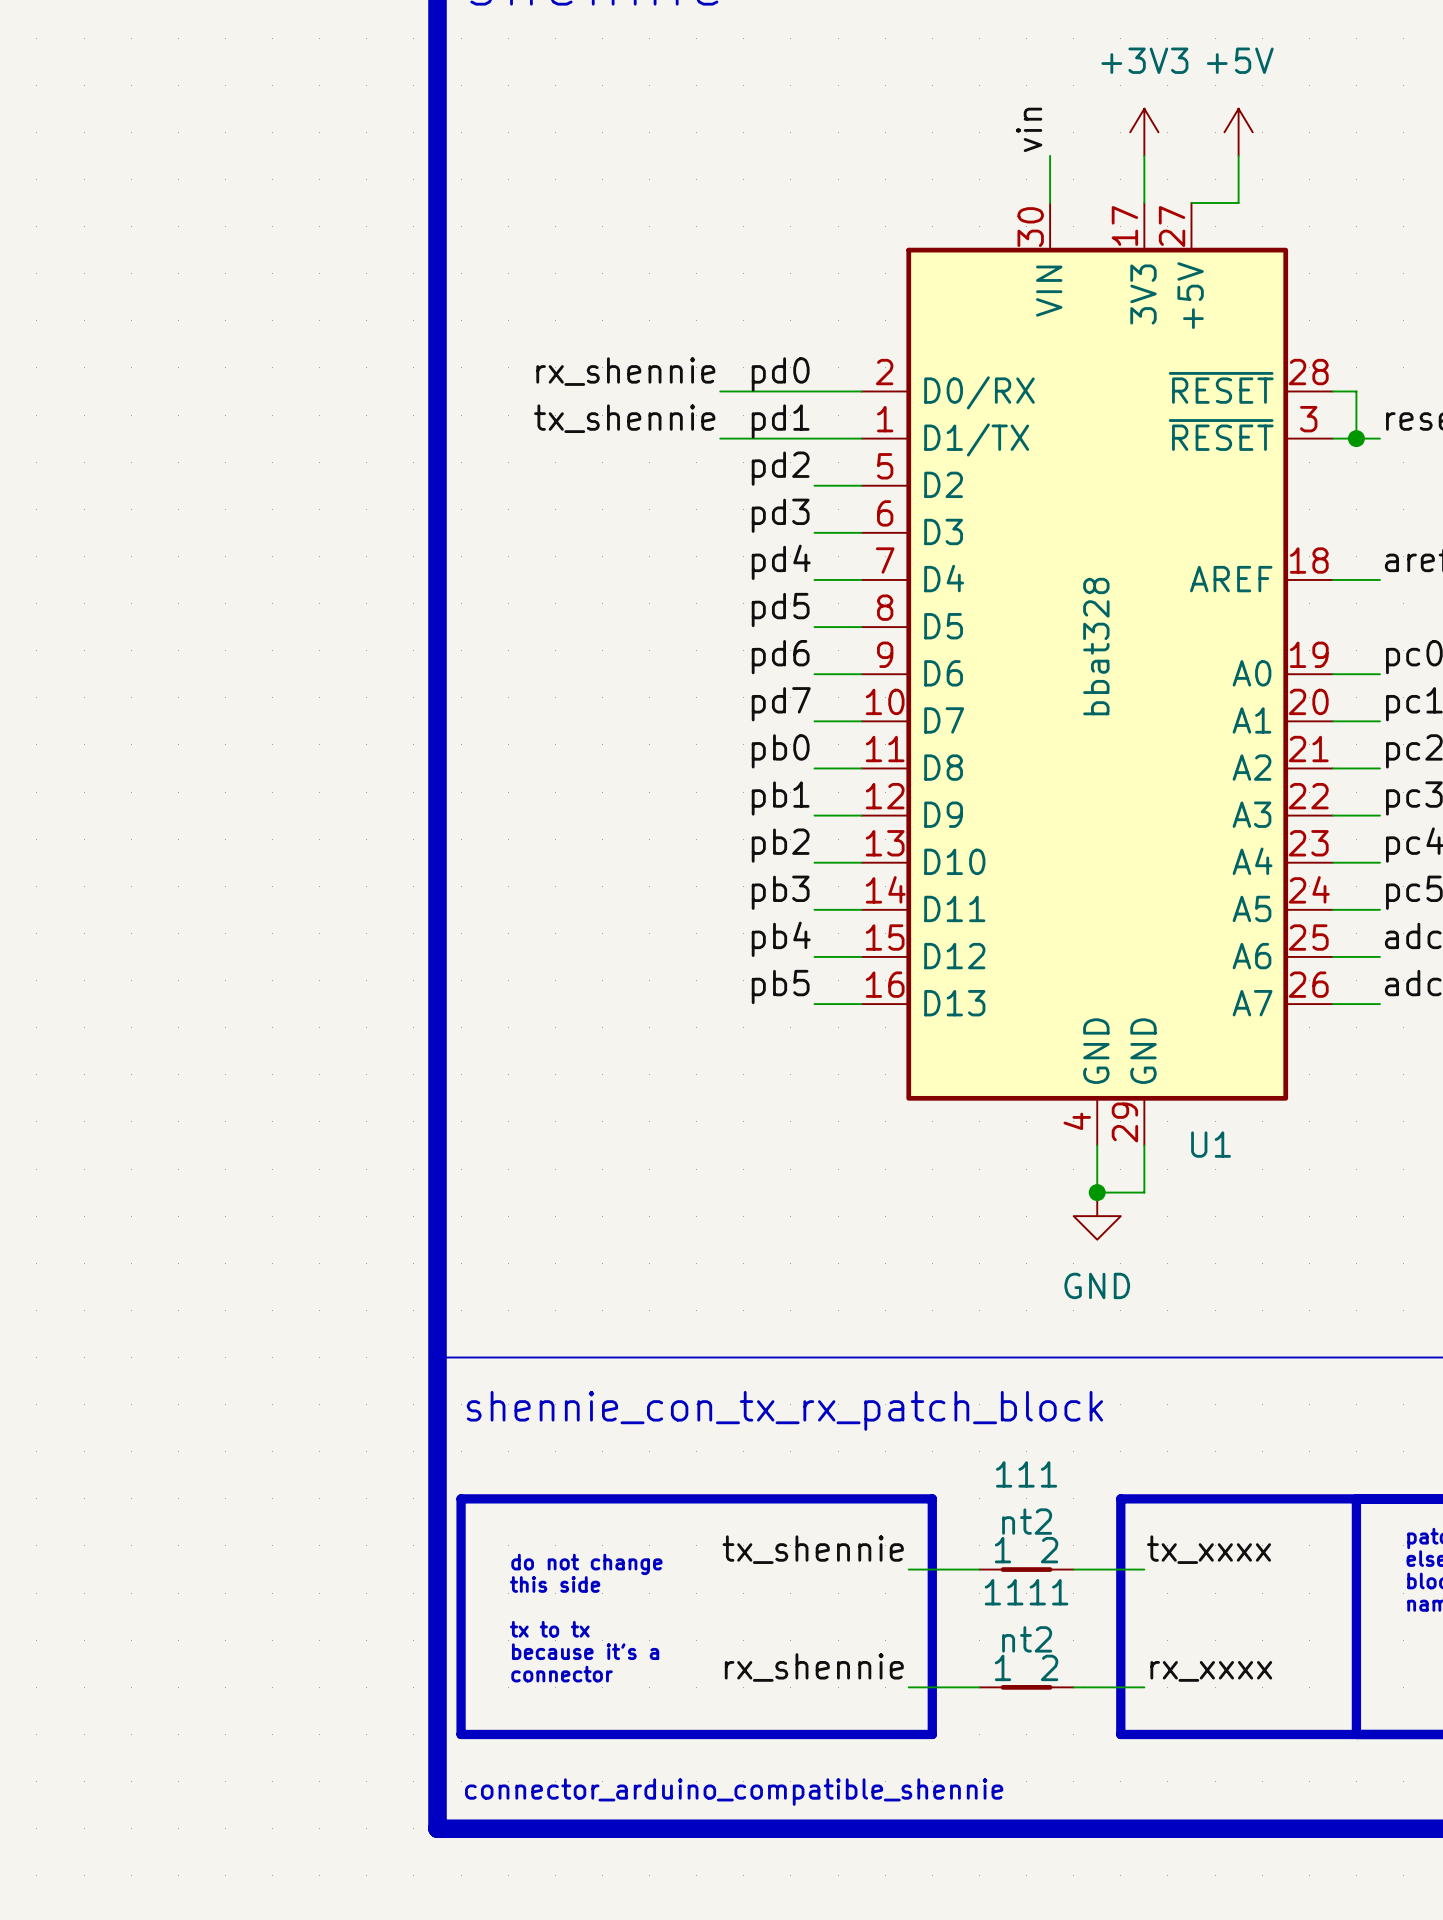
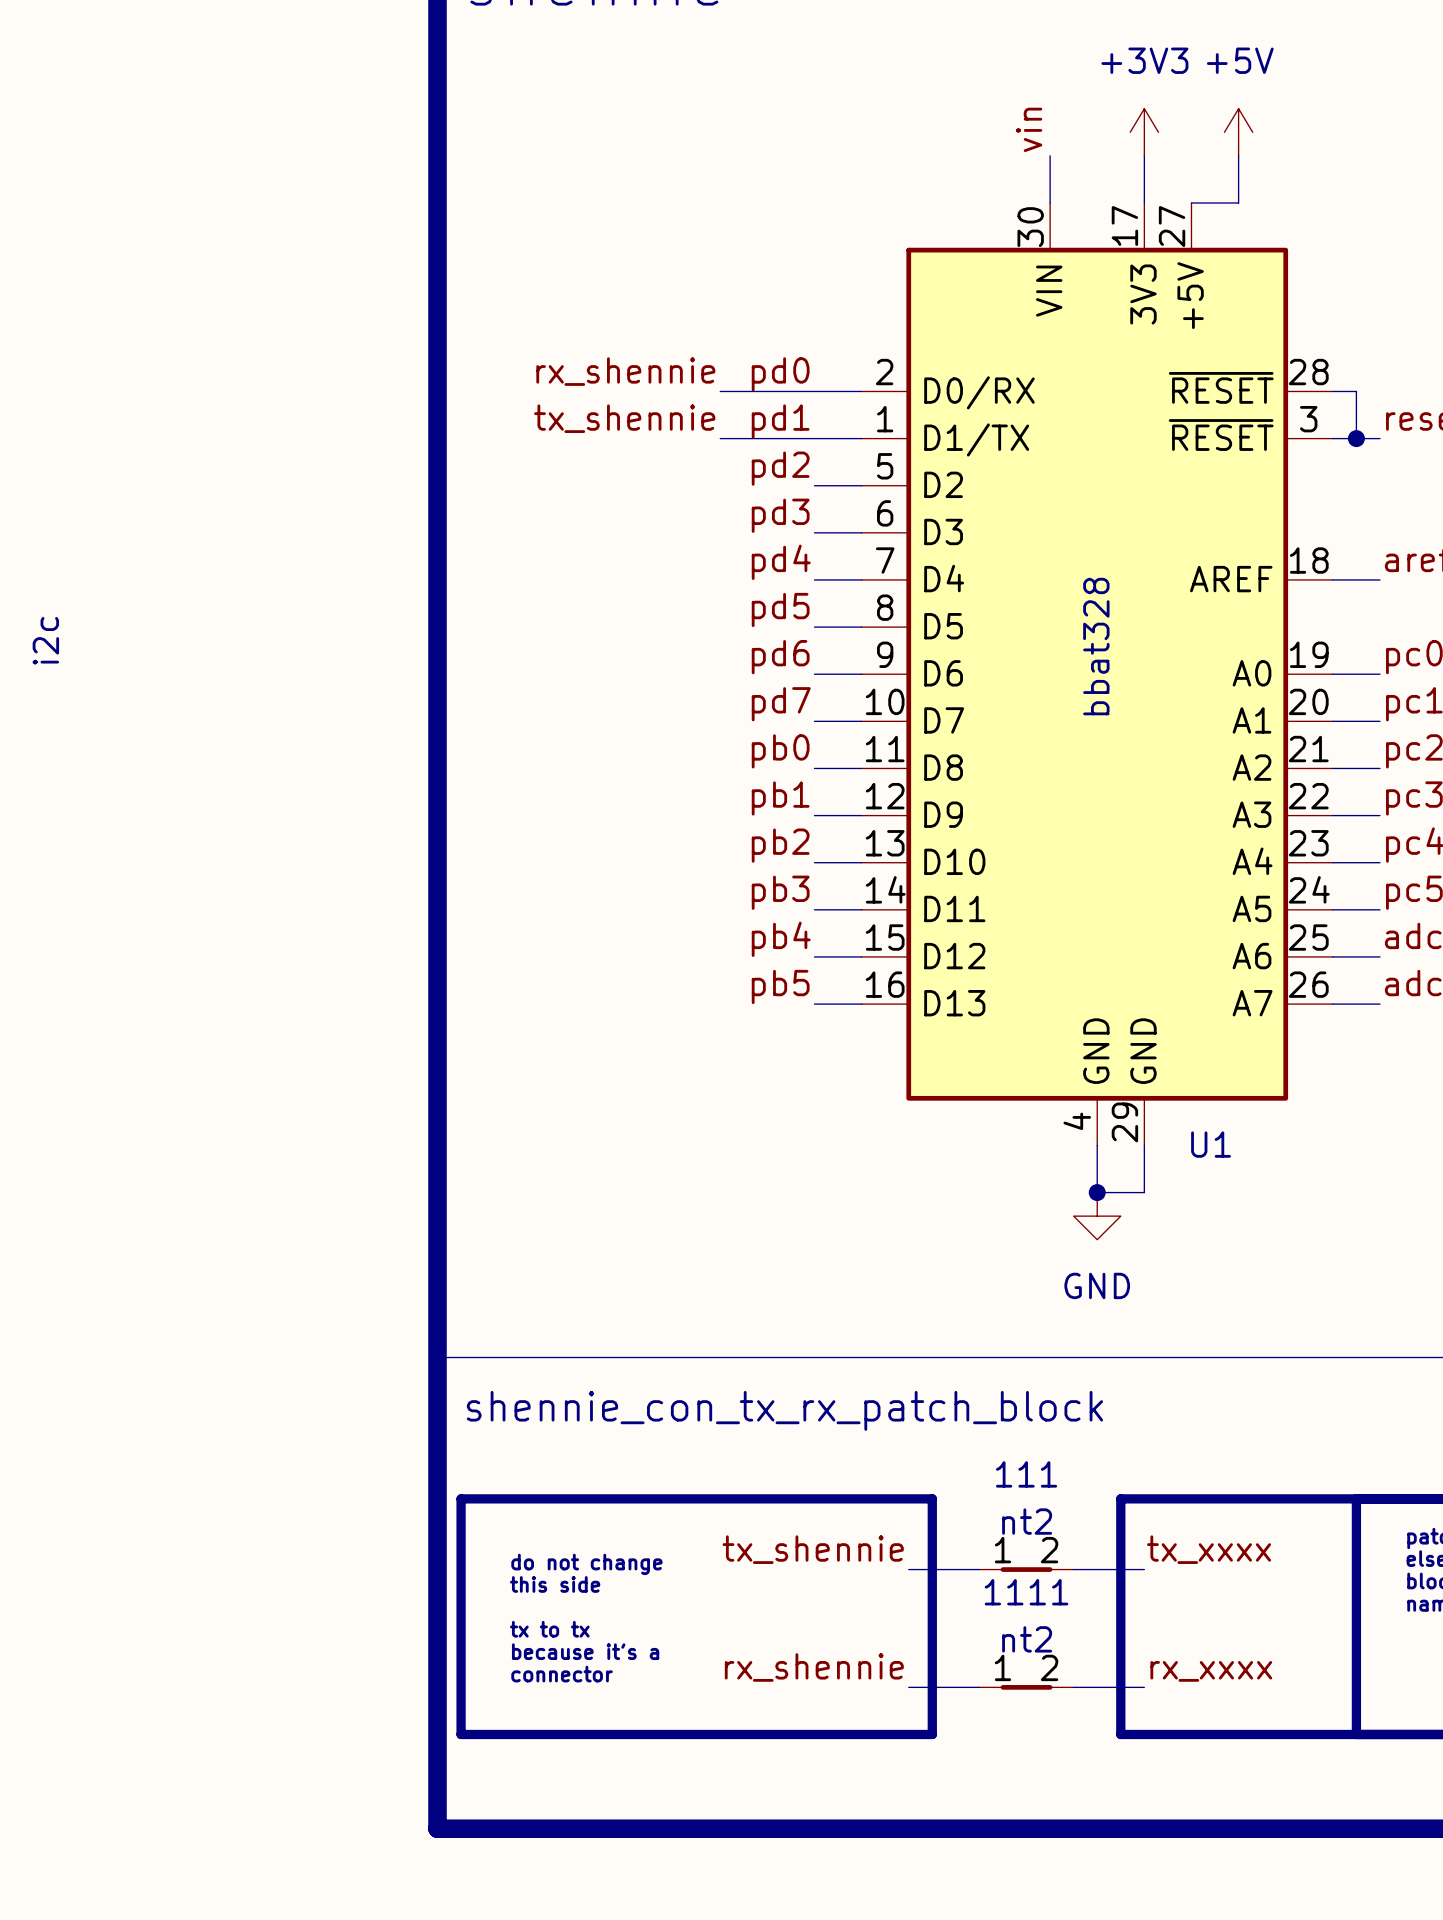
text: none -> i2c (45, 640)
text: connector_arduino_compatible_shennie (734, 1792) -> none

